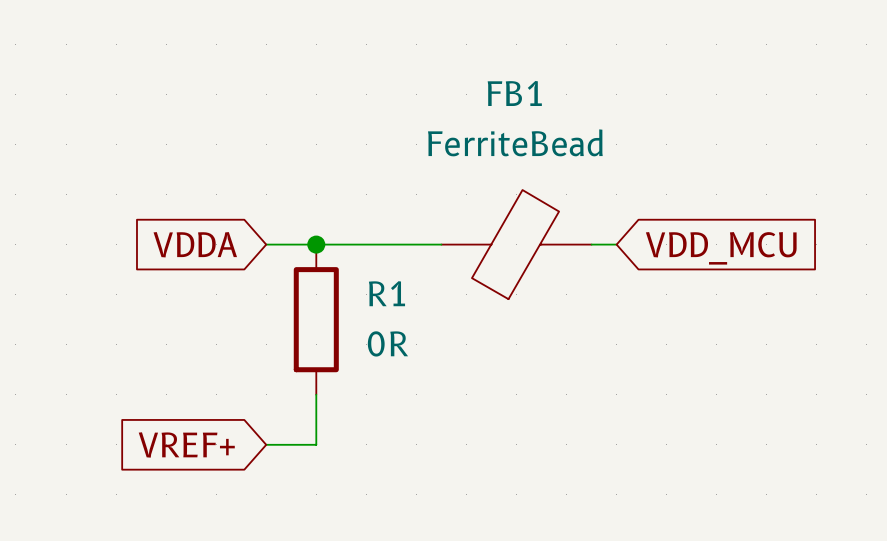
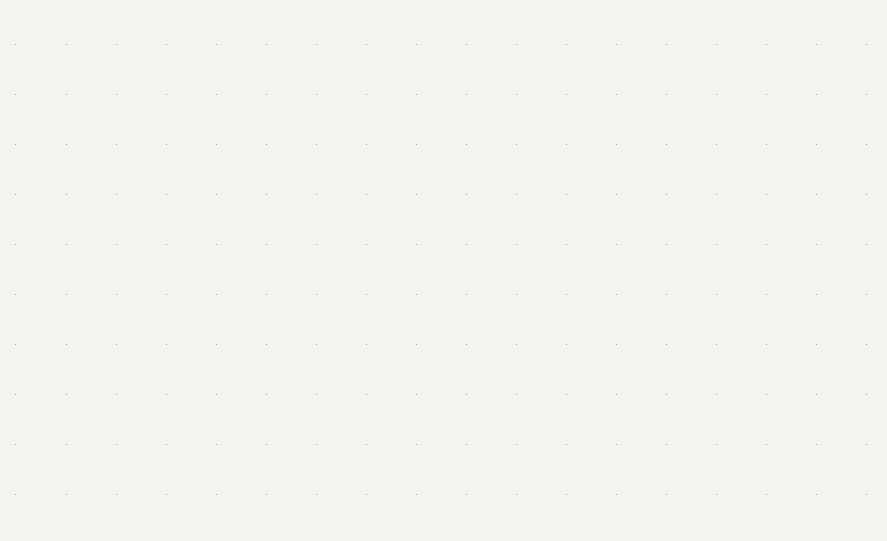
global label: VDDA (195, 244) -> none
wire: (266, 244) (441, 244) -> none
junction: (316, 244) -> none
FB1: FerriteBead (516, 244) -> none
wire: (591, 244) (616, 244) -> none
global label: VDD_MCU (721, 248) -> none
R1: 0R (316, 319) -> none
wire: (316, 394) (316, 444) (266, 444) -> none
global label: VREF+ (186, 444) -> none

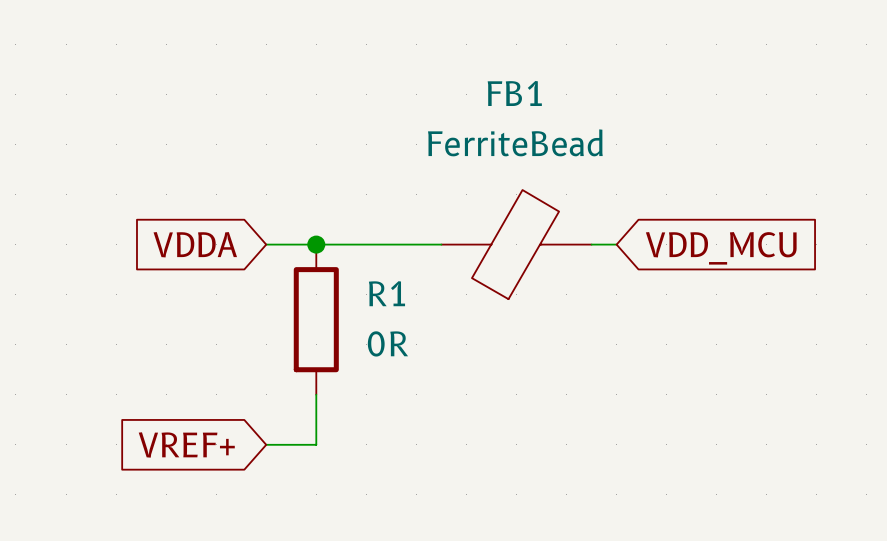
global label: none -> VDDA (195, 244)
wire: none -> (266, 244) (441, 244)
junction: none -> (316, 244)
FB1: none -> FerriteBead (516, 244)
wire: none -> (591, 244) (616, 244)
global label: none -> VDD_MCU (721, 248)
R1: none -> 0R (316, 319)
wire: none -> (316, 394) (316, 444) (266, 444)
global label: none -> VREF+ (186, 444)

